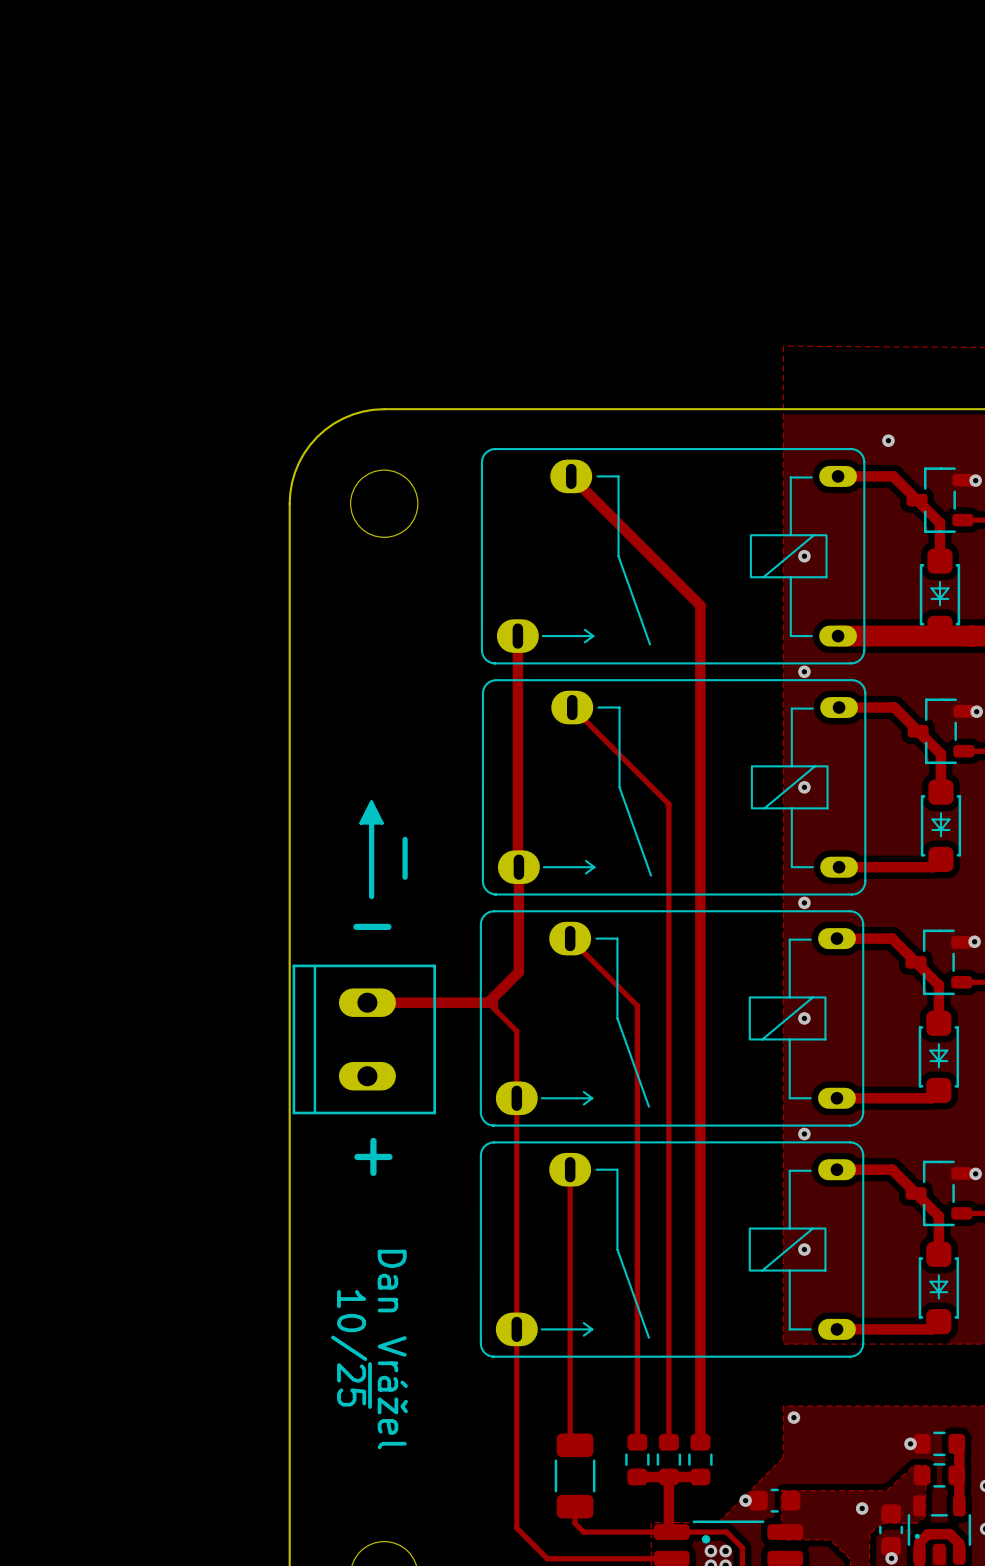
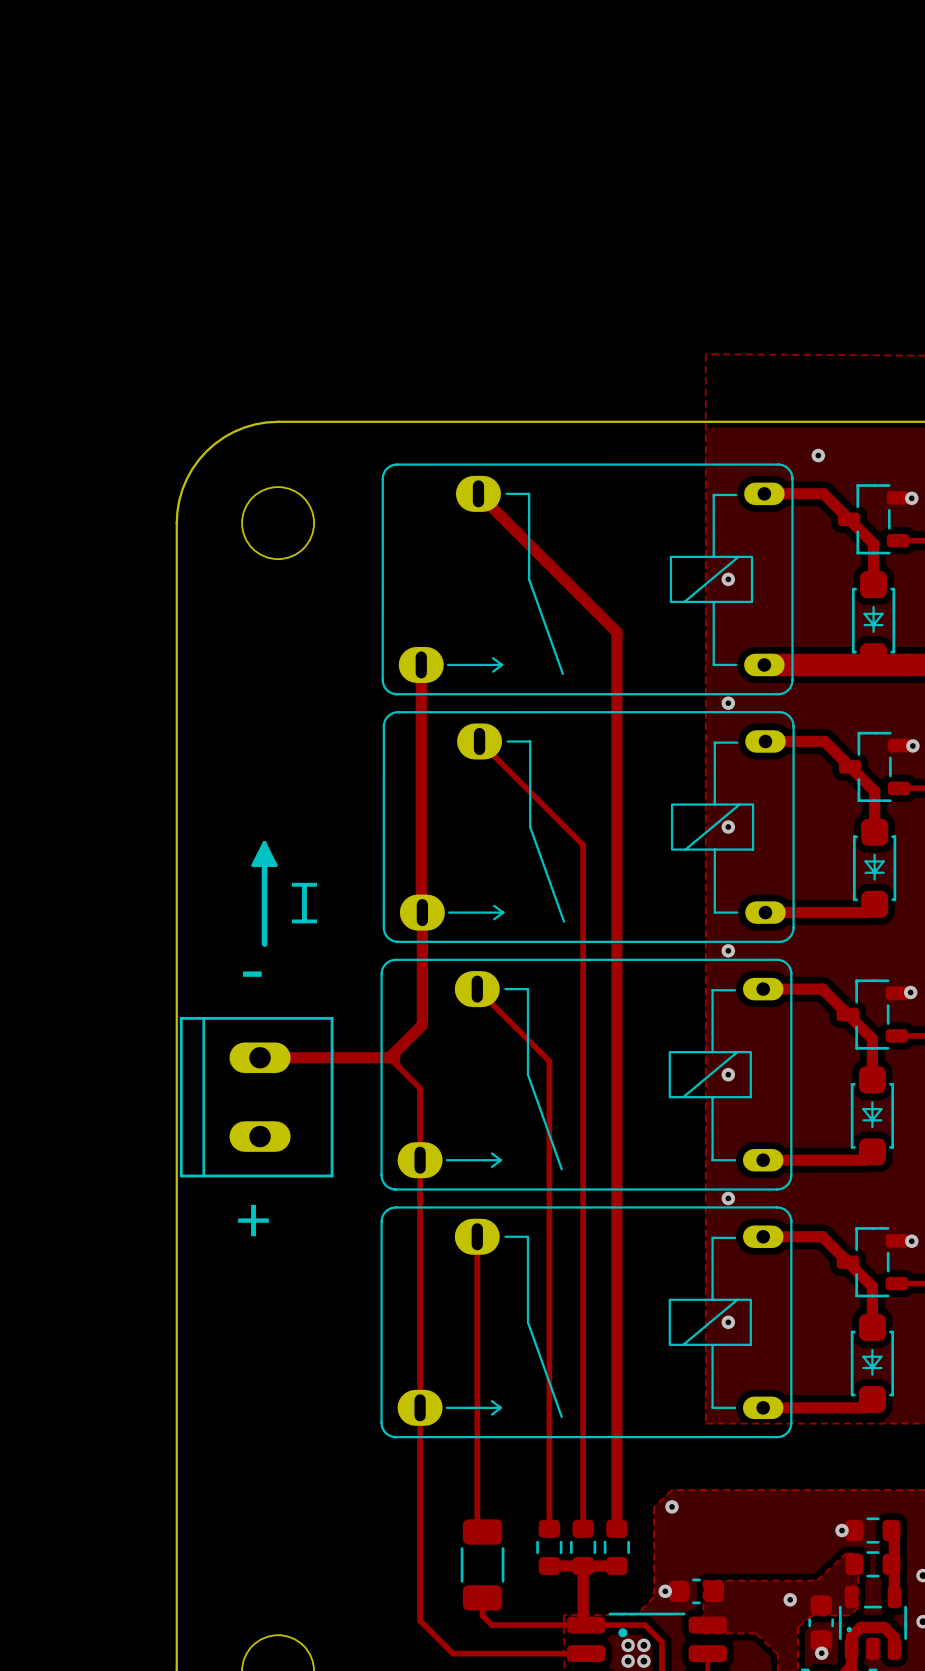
text: 10/~{25} (351, 1349) -> none
text: Dan Vrážel (392, 1349) -> none
zone outline: (783, 1406) (783, 1457) (735, 1505) -> (705, 1490) (671, 1490) (654, 1507) (654, 1596)
via position: (793, 1417) -> (672, 1506)

